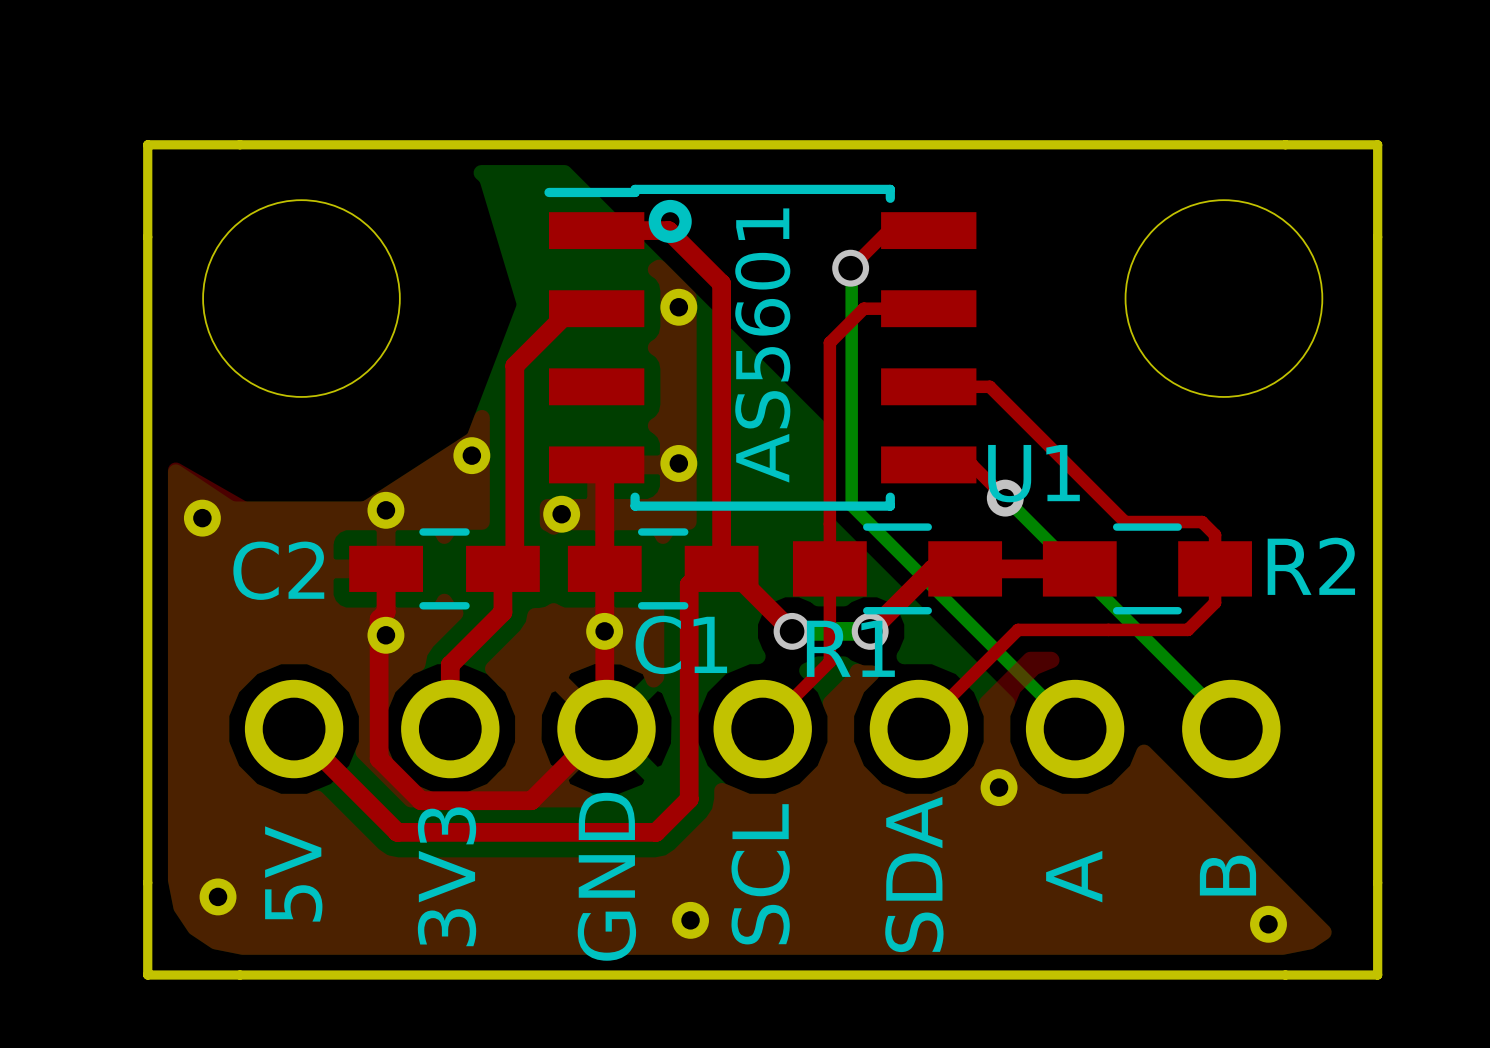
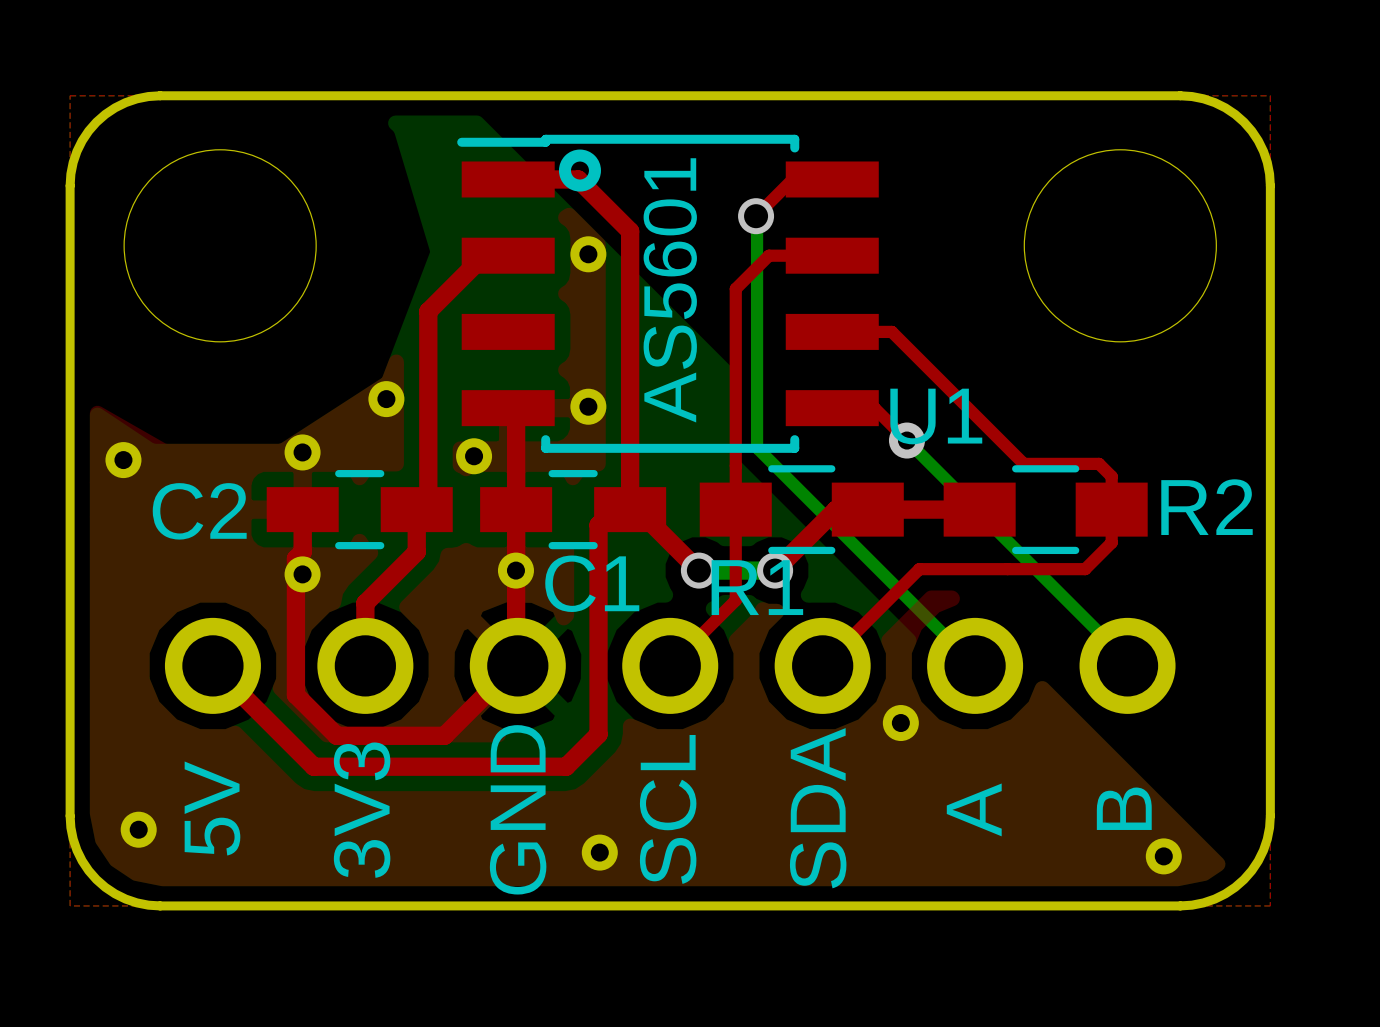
board edge: (239, 144) (147, 144) (147, 237) -> (160, 95) (148, 96) (125, 102) (105, 114) (96, 122) (88, 130) (76, 151) (73, 162) (70, 185)
board edge: (1285, 144) (1377, 144) (1377, 237) -> (1180, 95) (1192, 96) (1214, 102) (1235, 114) (1243, 122) (1251, 130) (1263, 151) (1269, 174) (1270, 185)
board edge: (147, 882) (147, 975) (239, 975) -> (70, 815) (73, 839) (76, 850) (88, 870) (96, 879) (105, 887) (125, 899) (148, 905) (160, 905)
board edge: (1377, 882) (1377, 975) (1285, 975) -> (1270, 815) (1269, 827) (1263, 850) (1251, 870) (1243, 879) (1235, 887) (1214, 899) (1192, 905) (1180, 905)

